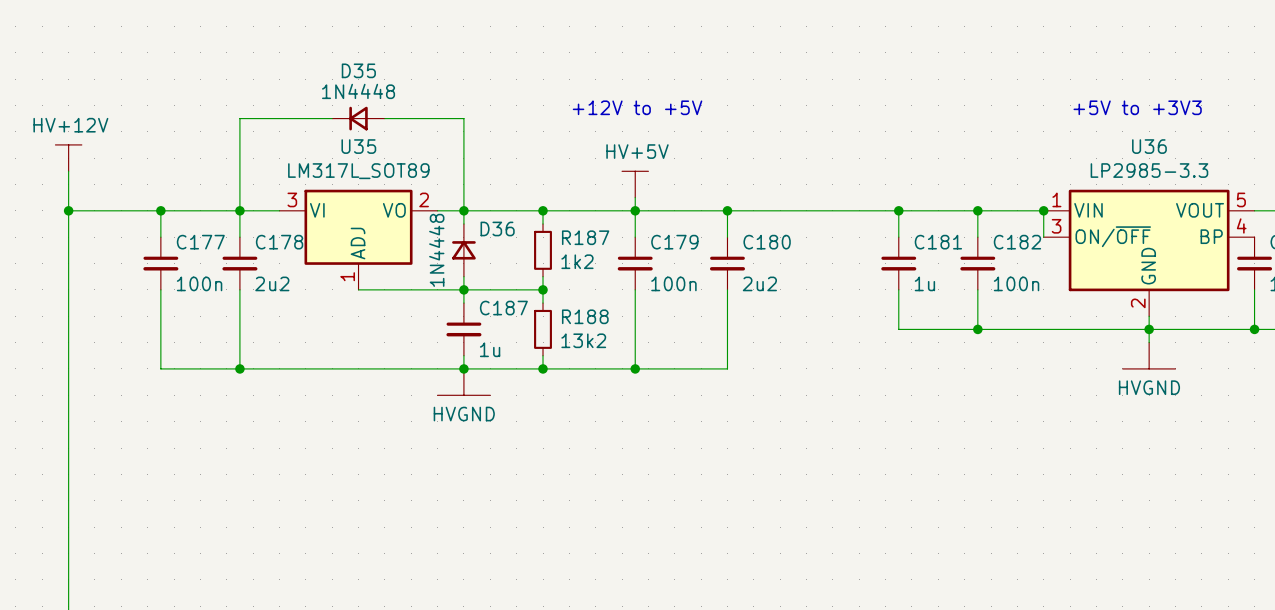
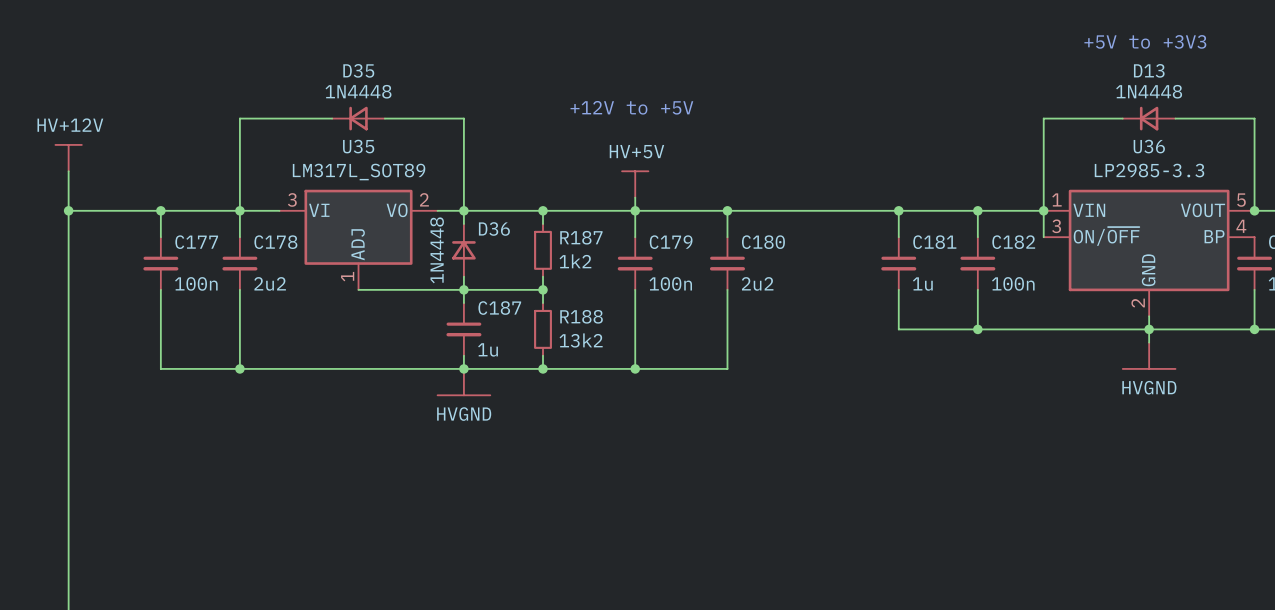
text position: +5V to +3V3 (1137, 107) -> +5V to +3V3 (1145, 41)
wire: none -> (1122, 118) (1043, 118) (1043, 210)
D13: none -> 1N4448 (1149, 118)
wire: none -> (1175, 118) (1254, 118) (1254, 210)
junction: none -> (1254, 210)

